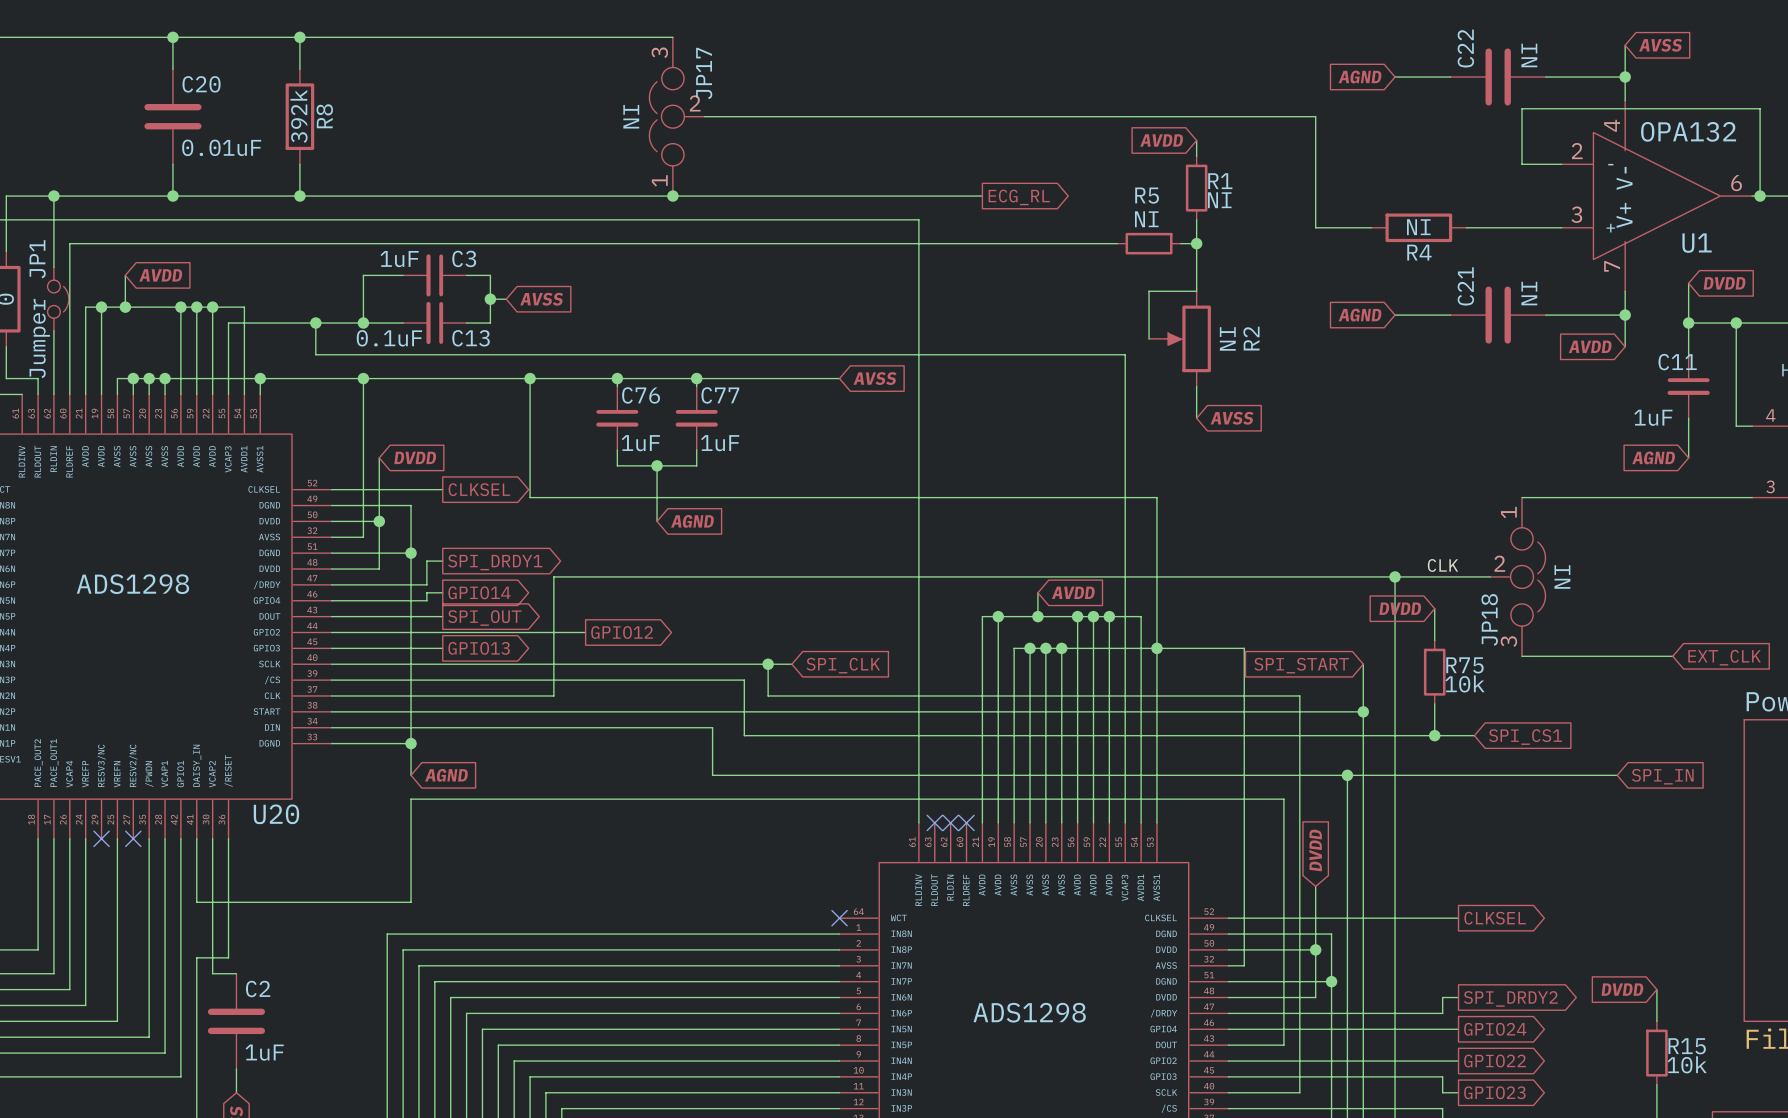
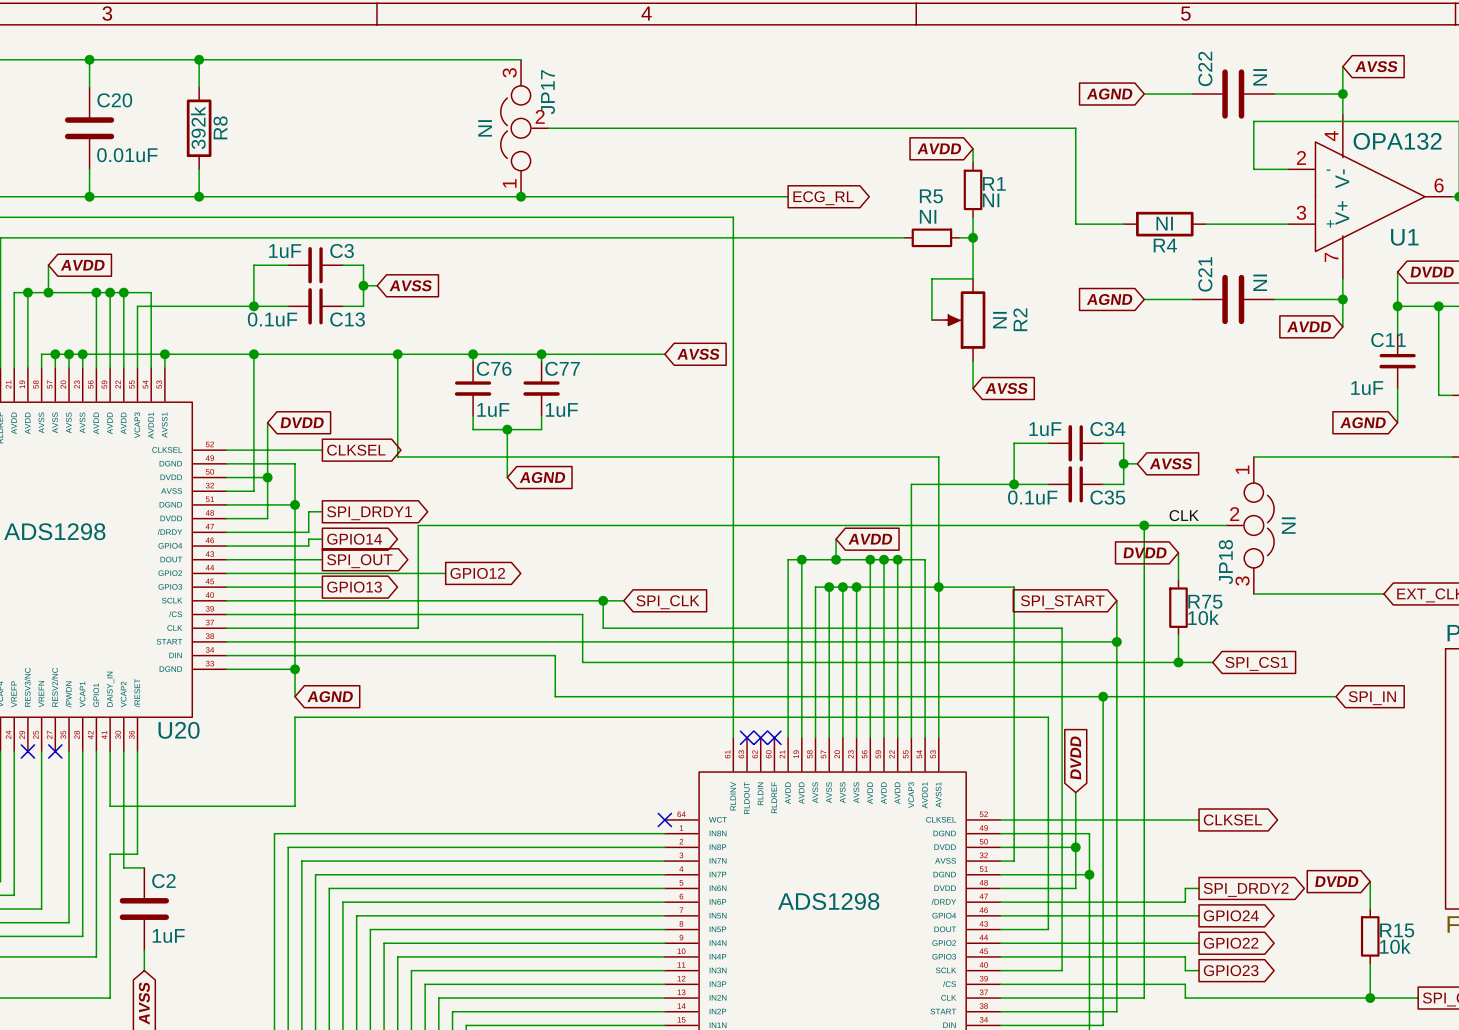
wire: (315, 323) (315, 354) (1125, 354) (1125, 529) -> (1048, 484) (911, 484)
junction: (315, 323) -> none
wire: none -> (1048, 443) (1014, 443) (1014, 484)
C34: none -> 1uF (1075, 443)
wire: none -> (1103, 443) (1123, 443) (1123, 484) (1103, 484)
wire: none -> (1123, 463) (1137, 463)
junction: none -> (1123, 463)
global label: none -> AVSS (1170, 463)
junction: none -> (1014, 484)
C35: none -> 0.1uF (1075, 484)

